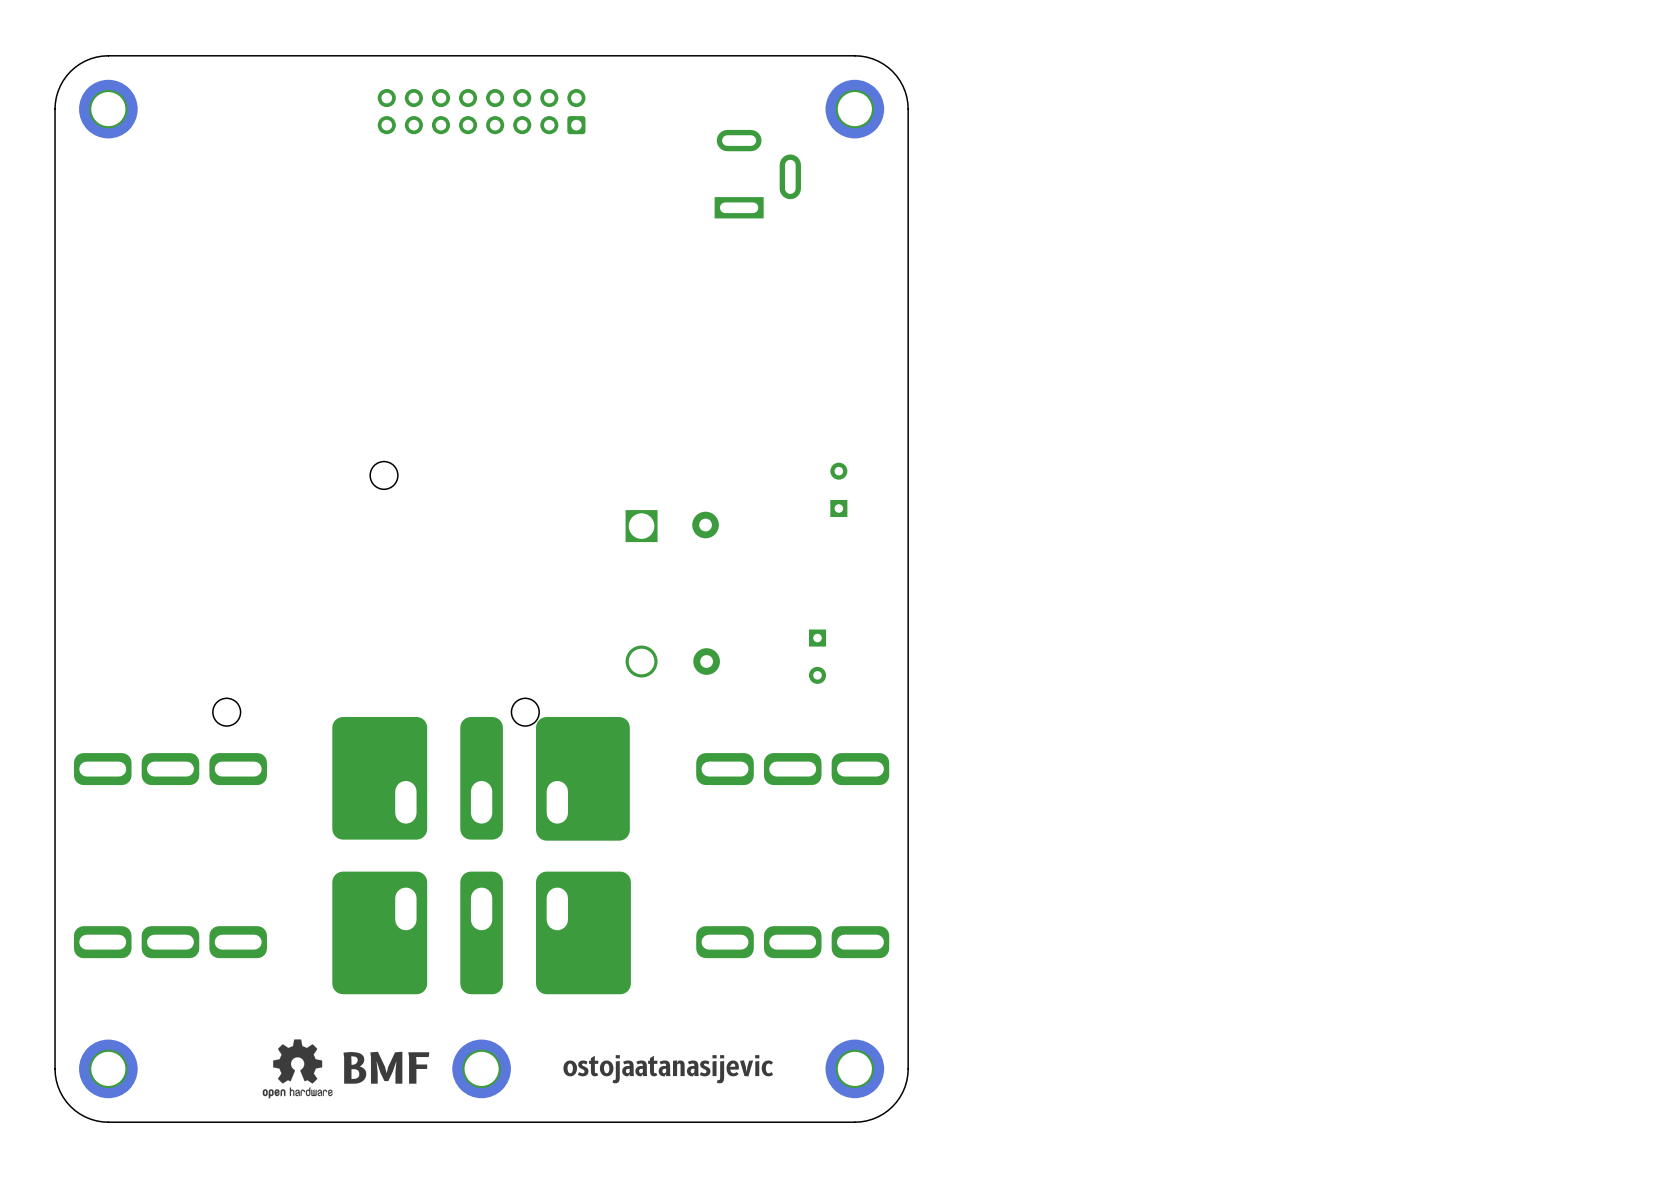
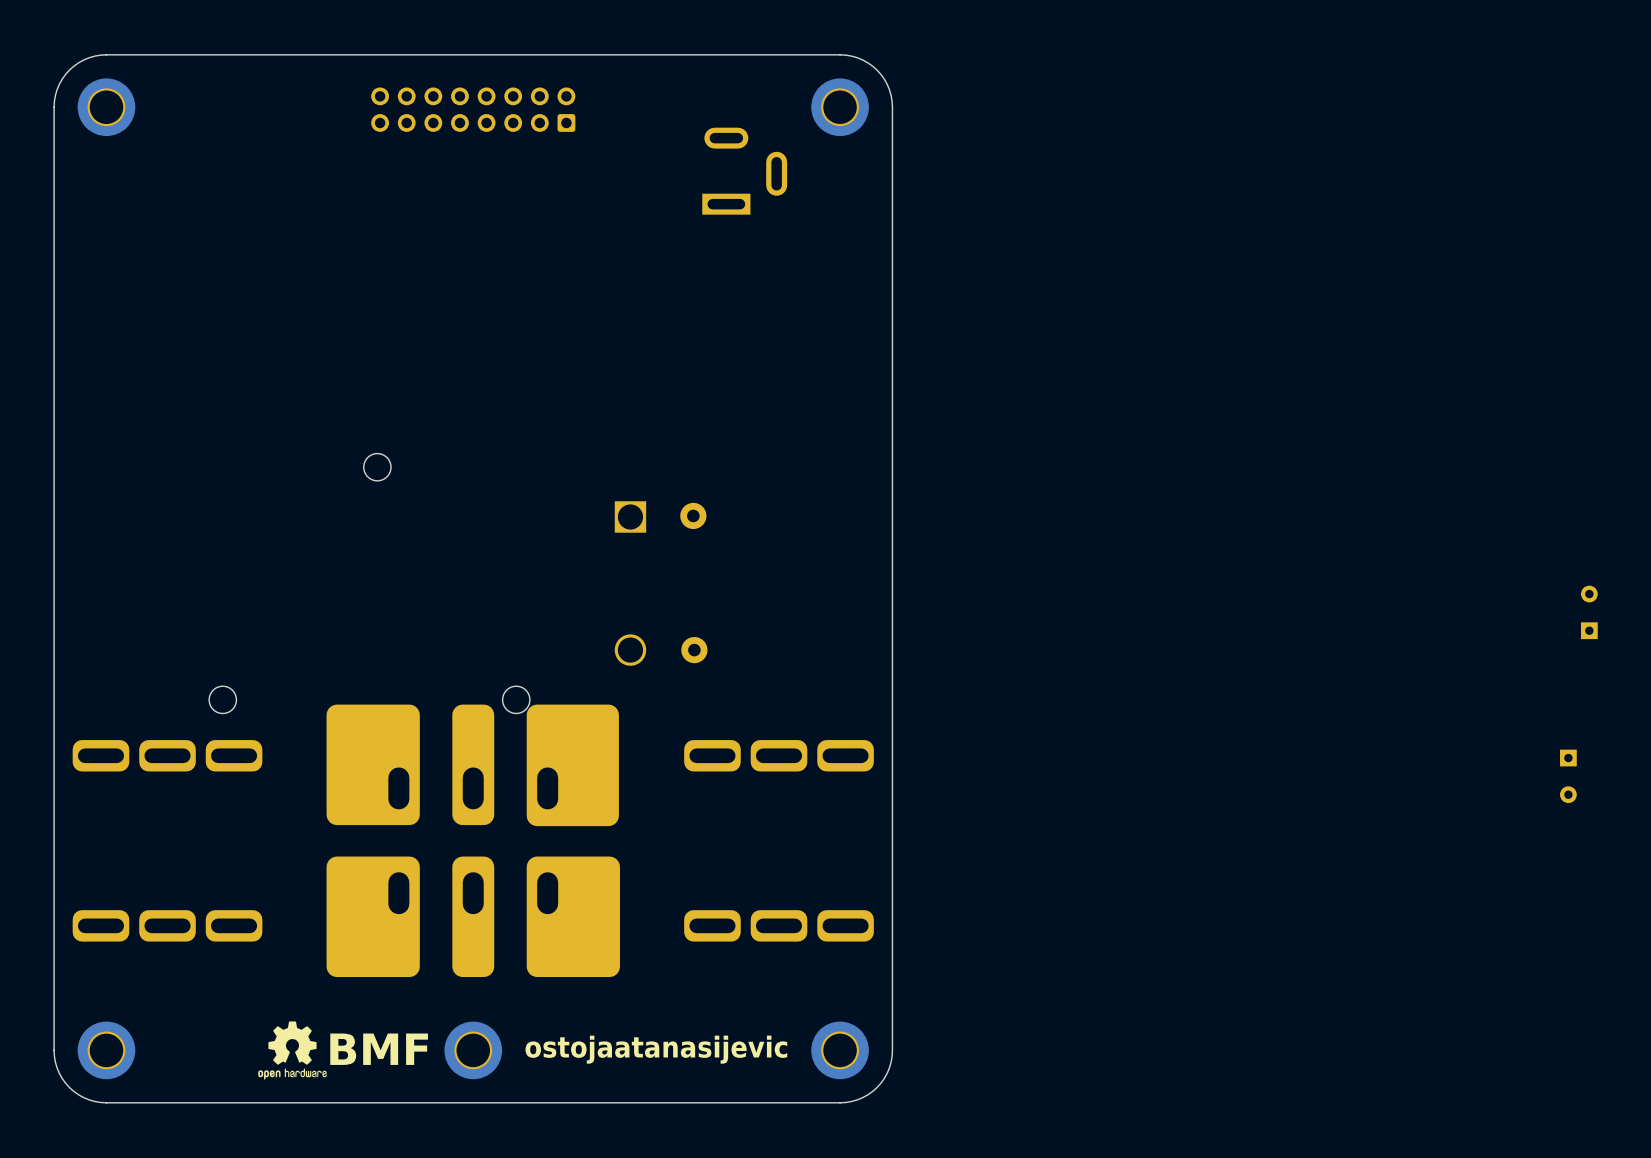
part: (838, 489) -> none
part: none -> (1589, 612)
part: (817, 656) -> none
part: none -> (1568, 776)

